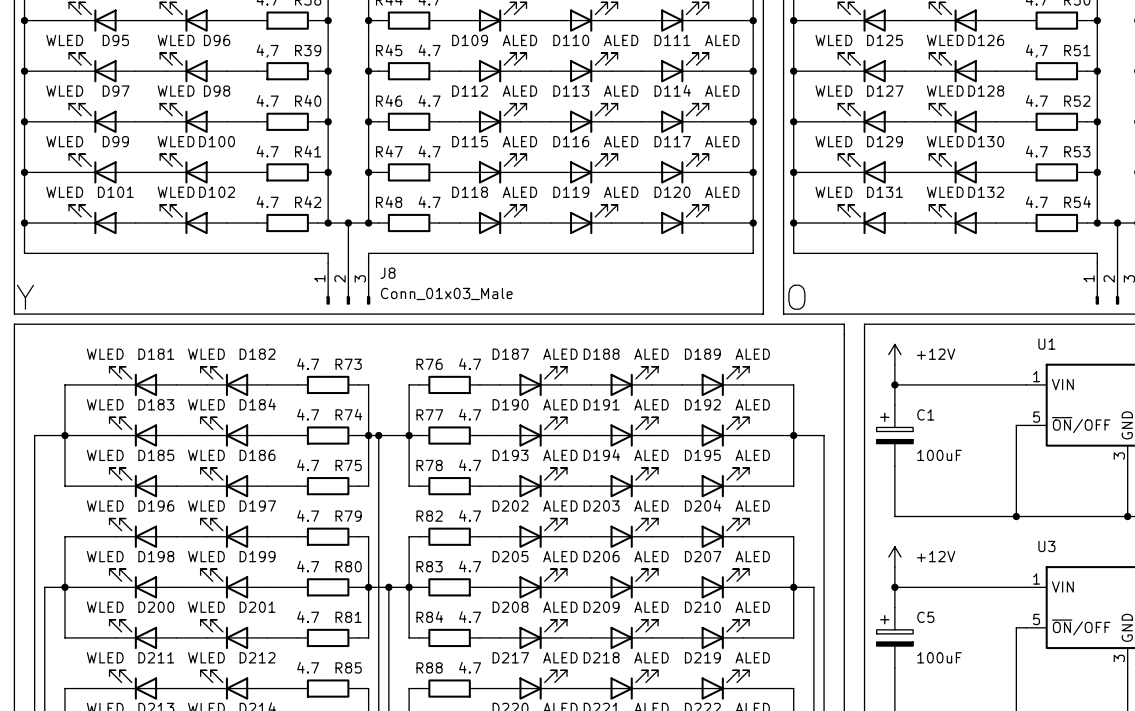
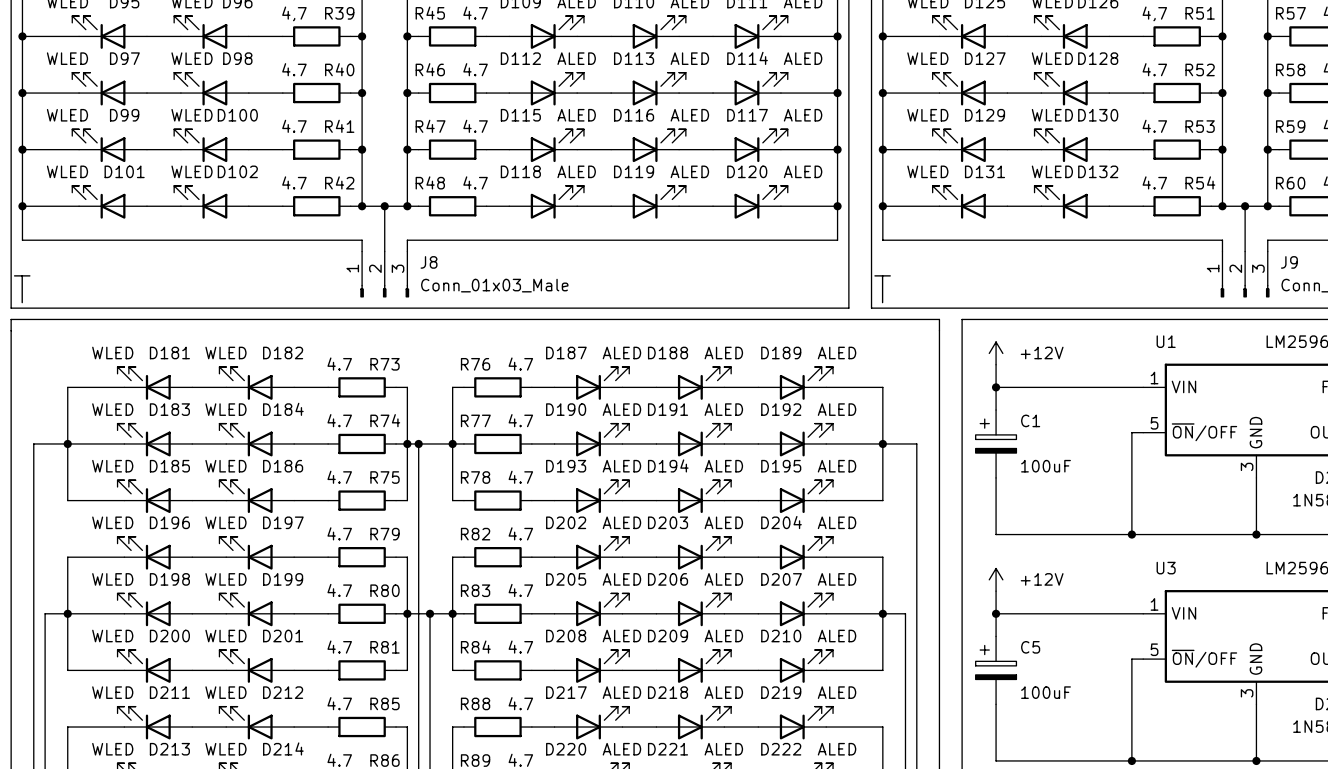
text: Y (25, 297) -> T (22, 289)
text: O (796, 297) -> T (882, 289)

